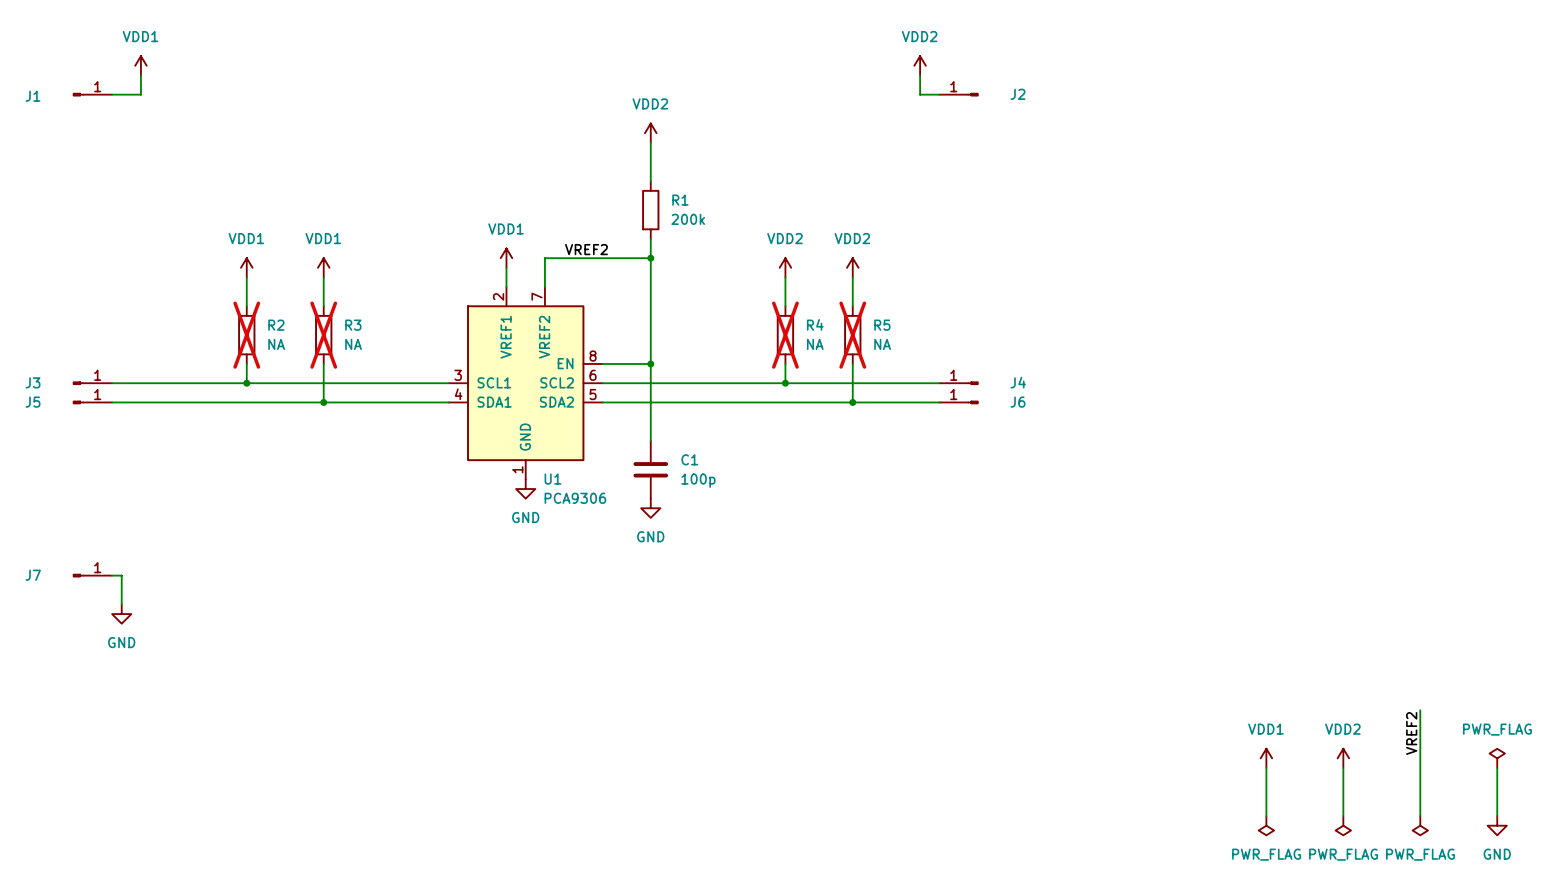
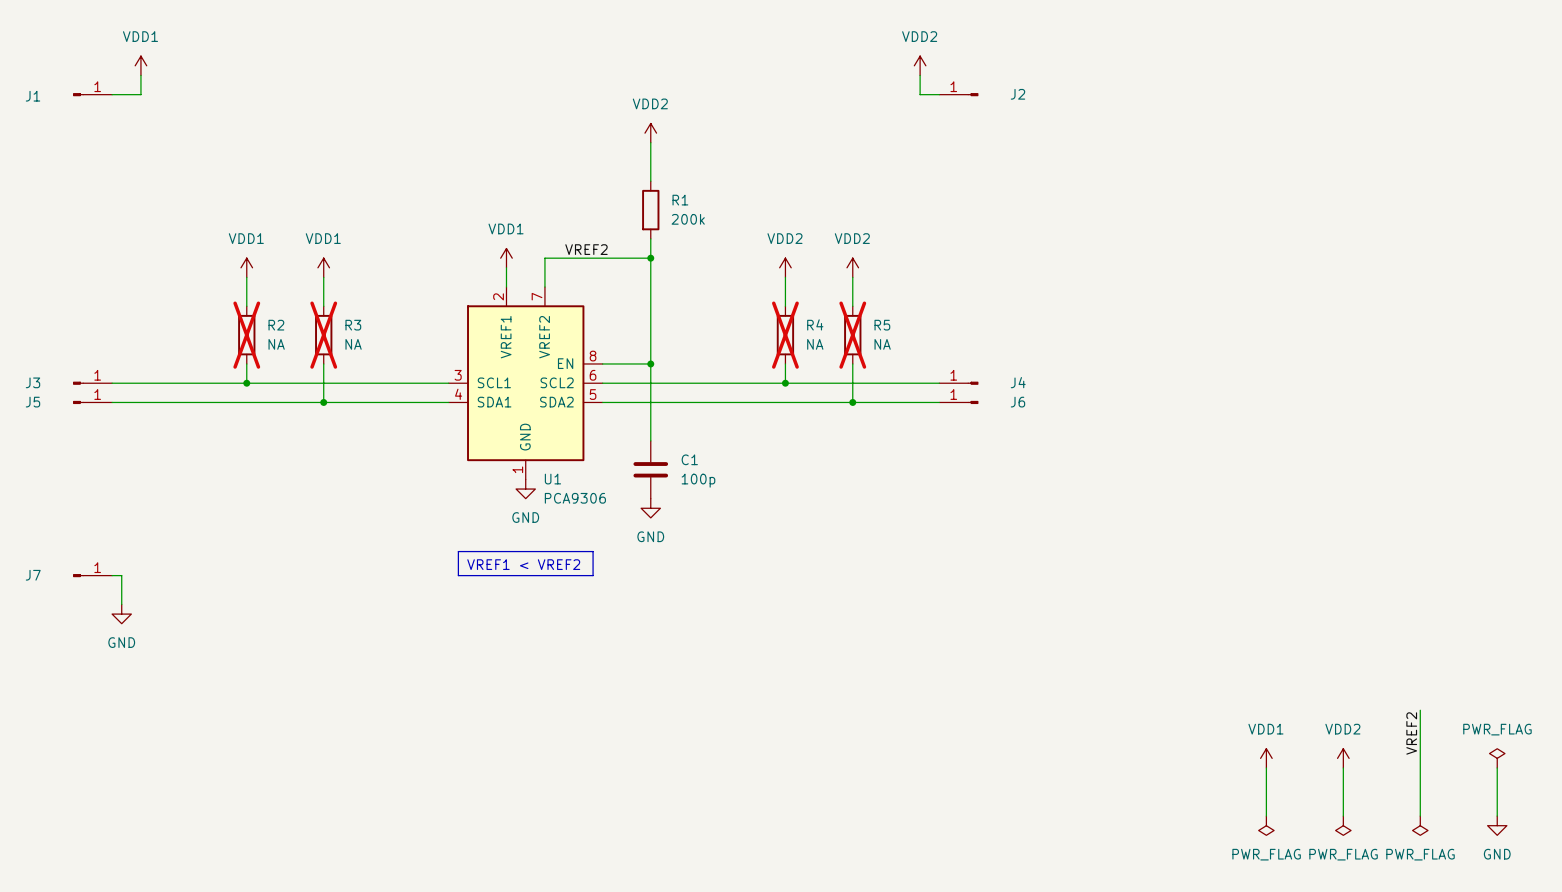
line: none -> (458, 551) (593, 551) (593, 575) (458, 575) (458, 551)
text: none -> VREF1 < VREF2 (523, 564)

